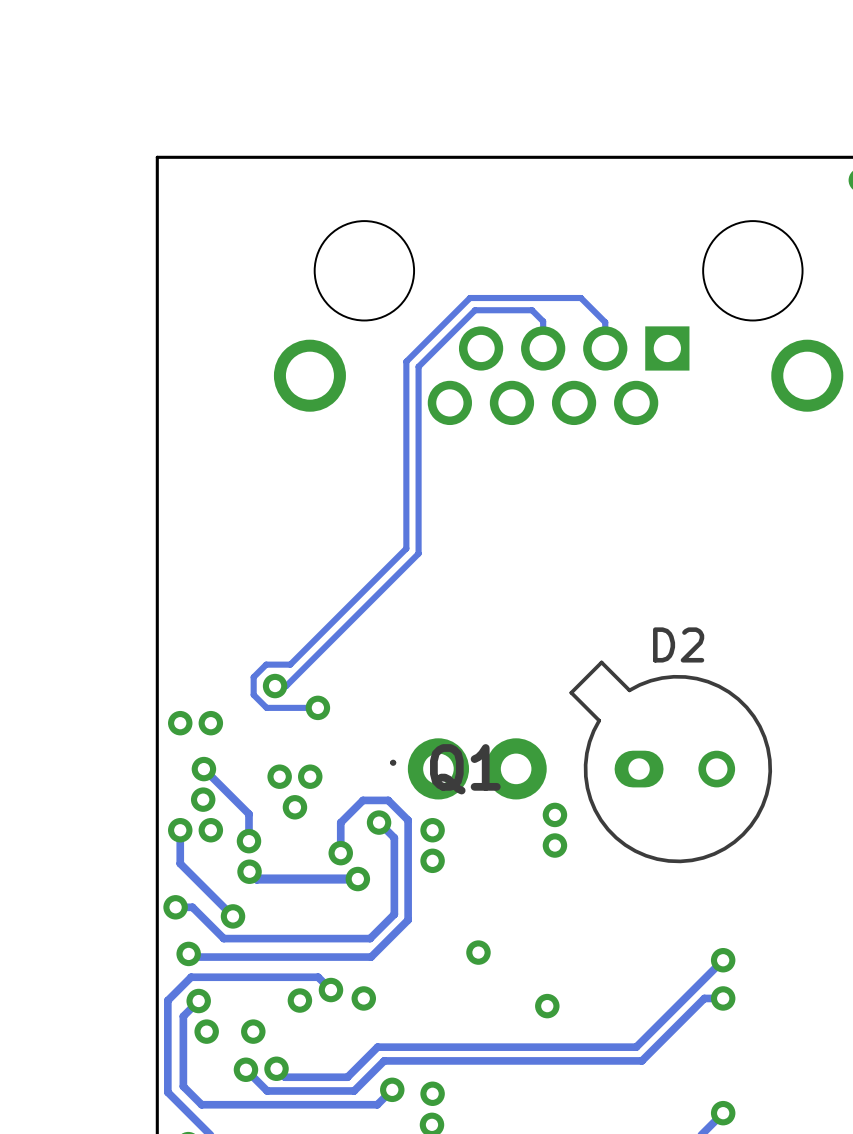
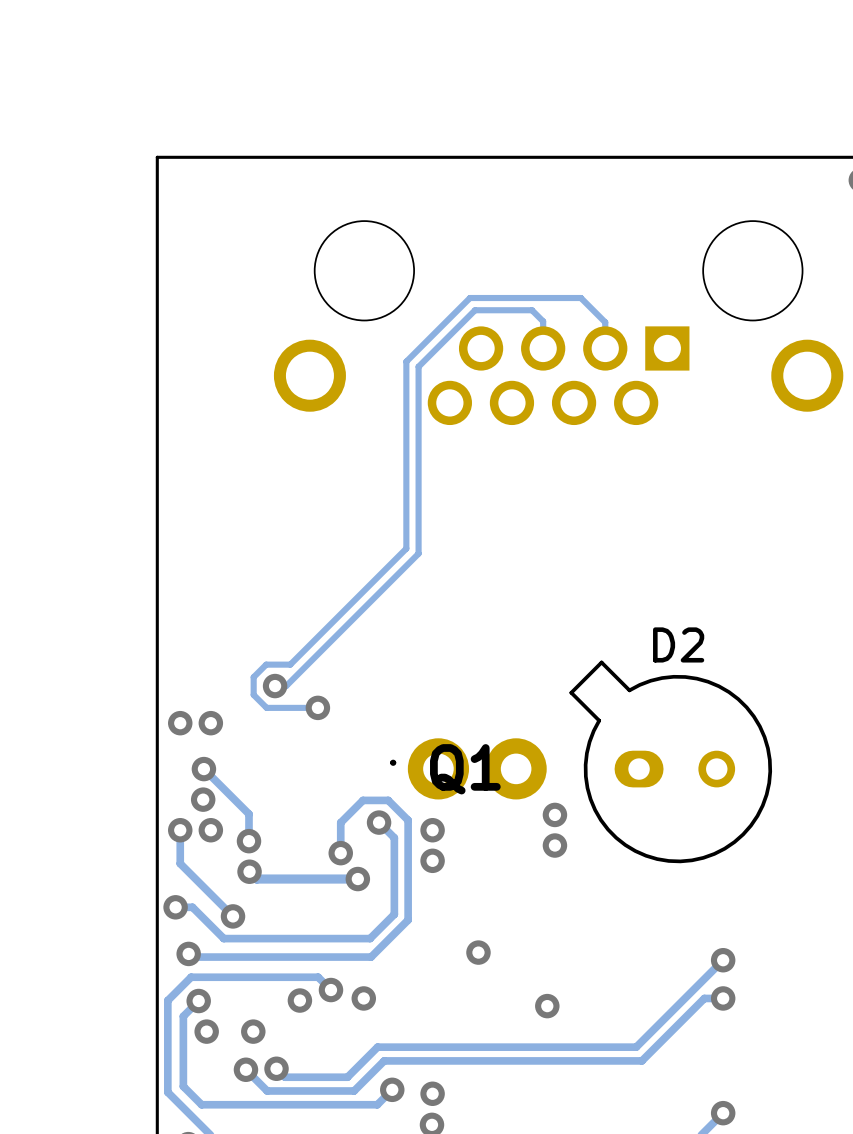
via: (279, 776) -> none
via: (310, 776) -> none
via: (294, 807) -> none

